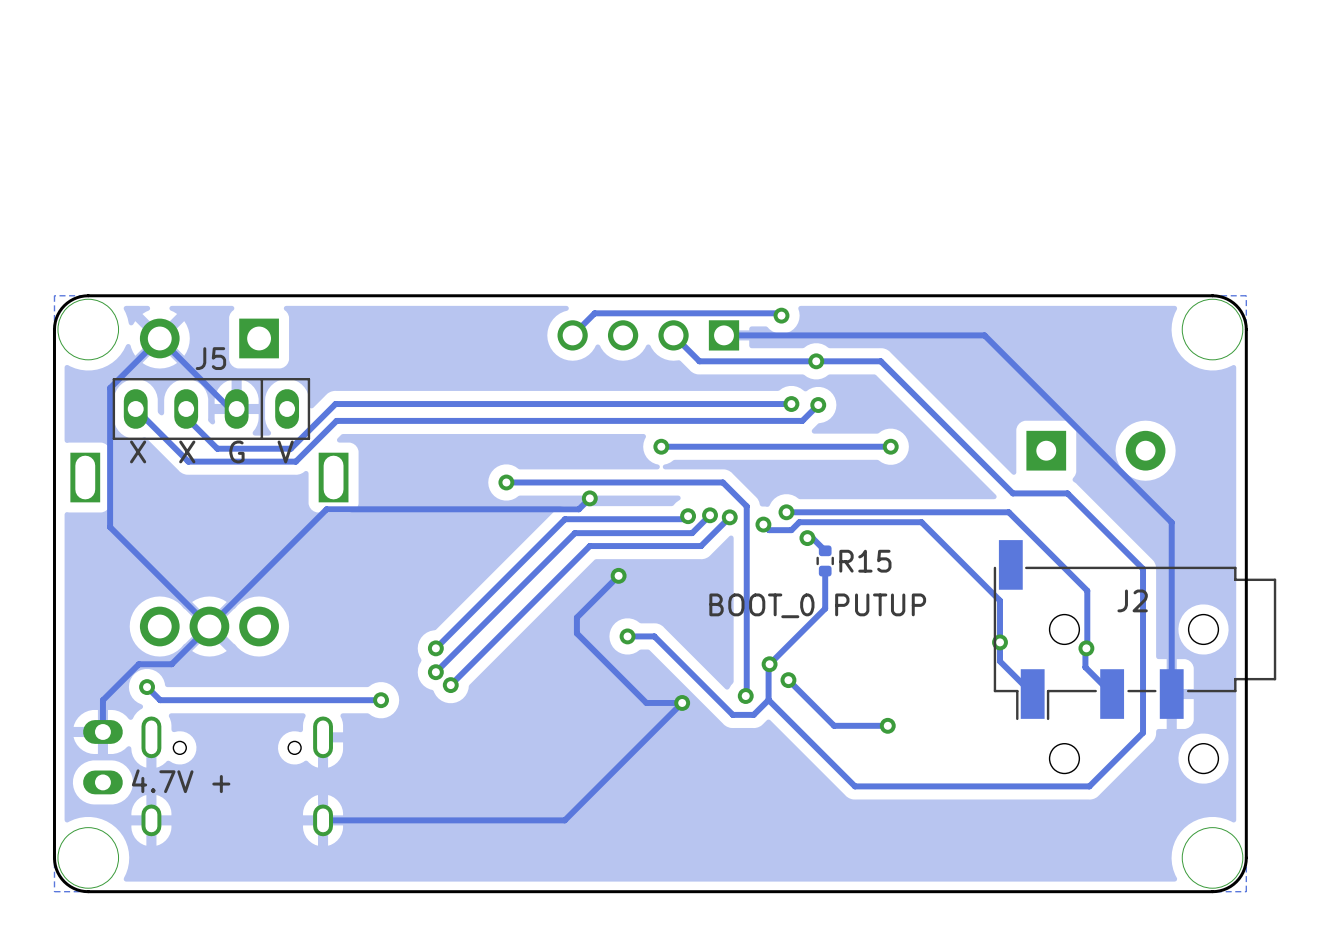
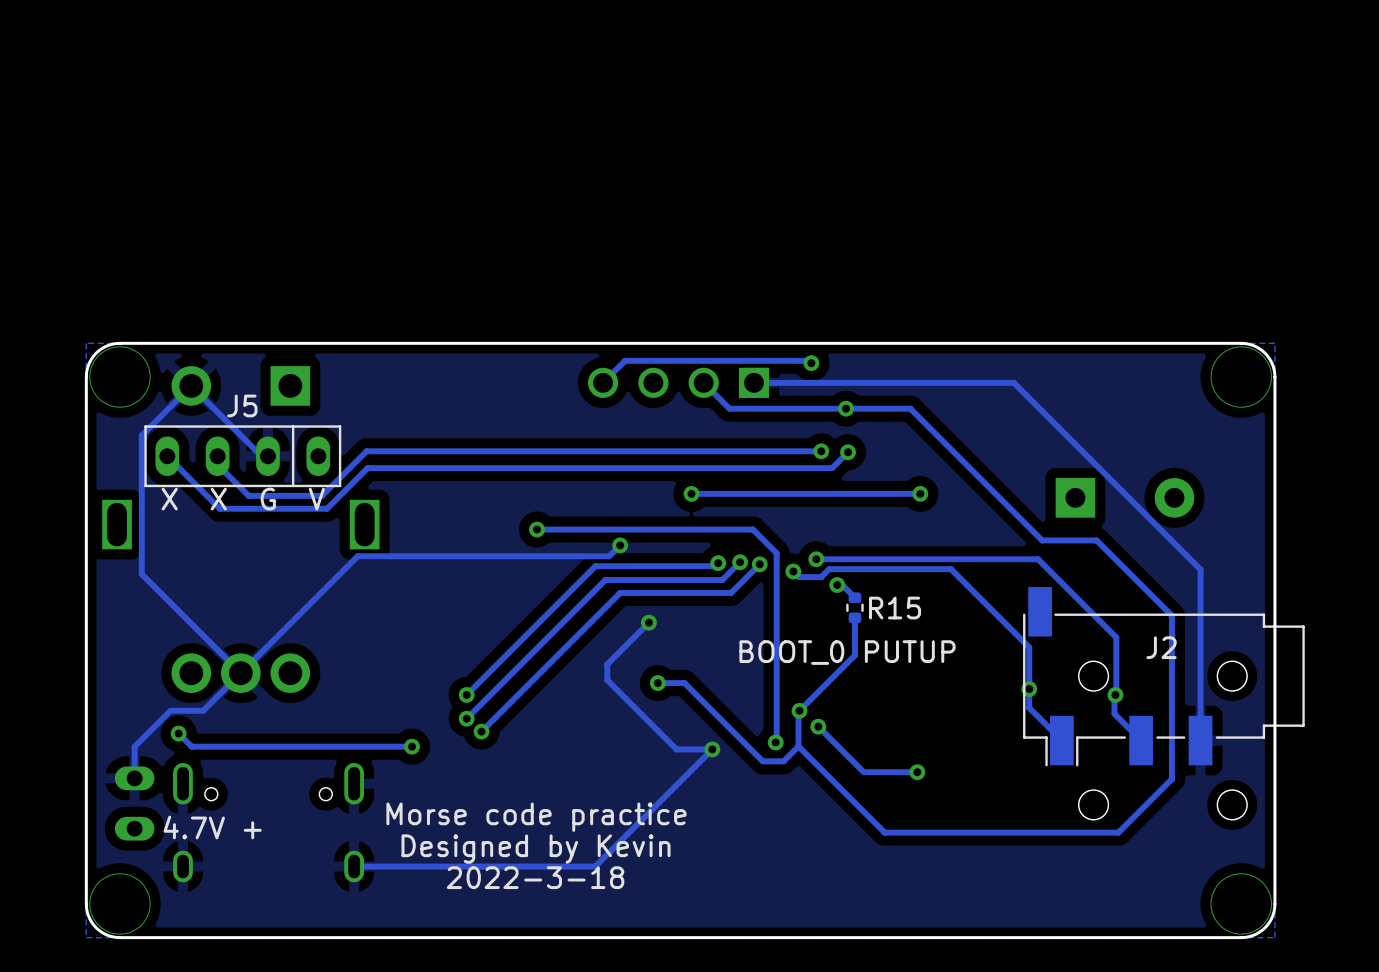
text: none -> Morse code practice (536, 817)
text: none -> Designed by Kevin (536, 849)
text: none -> 2022-3-18 (535, 877)

